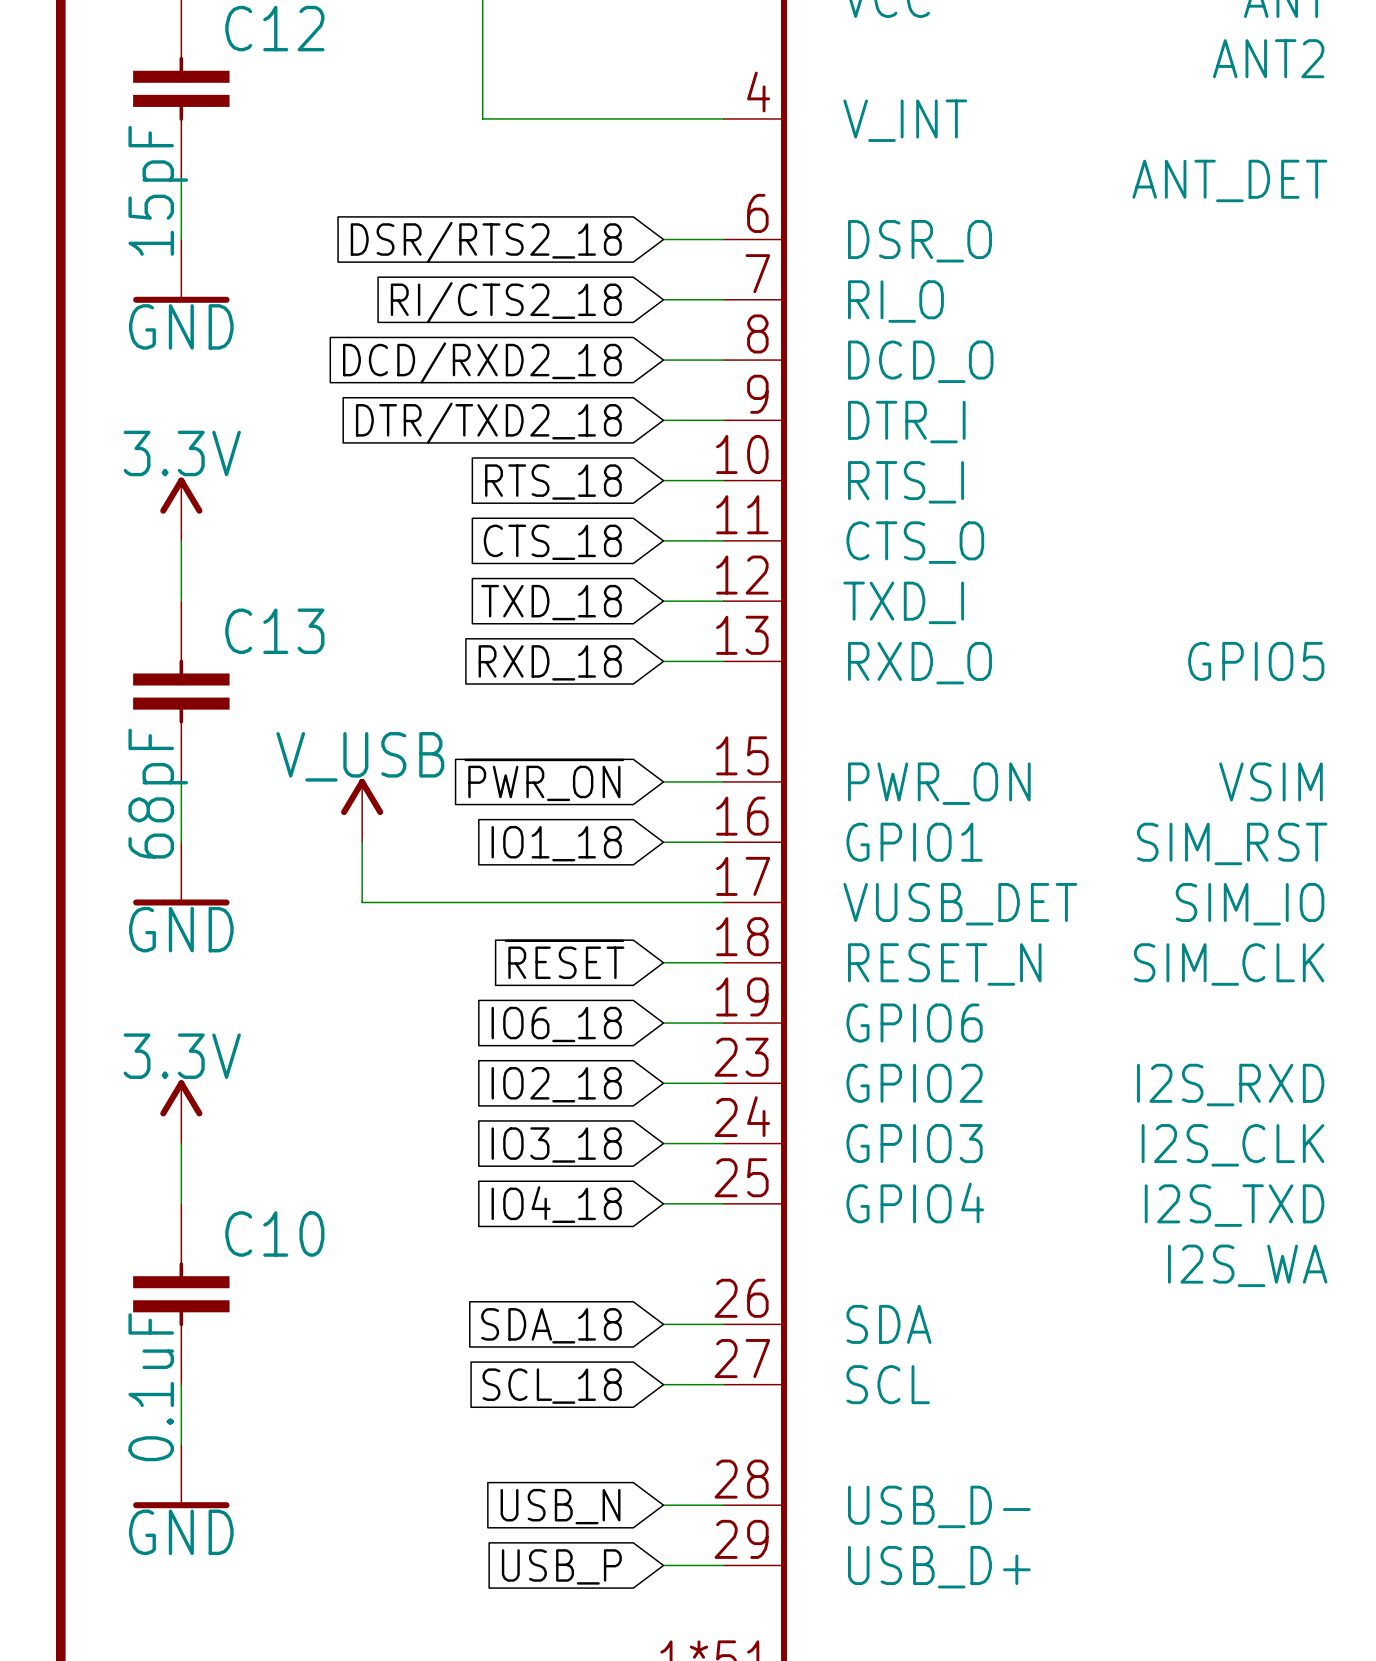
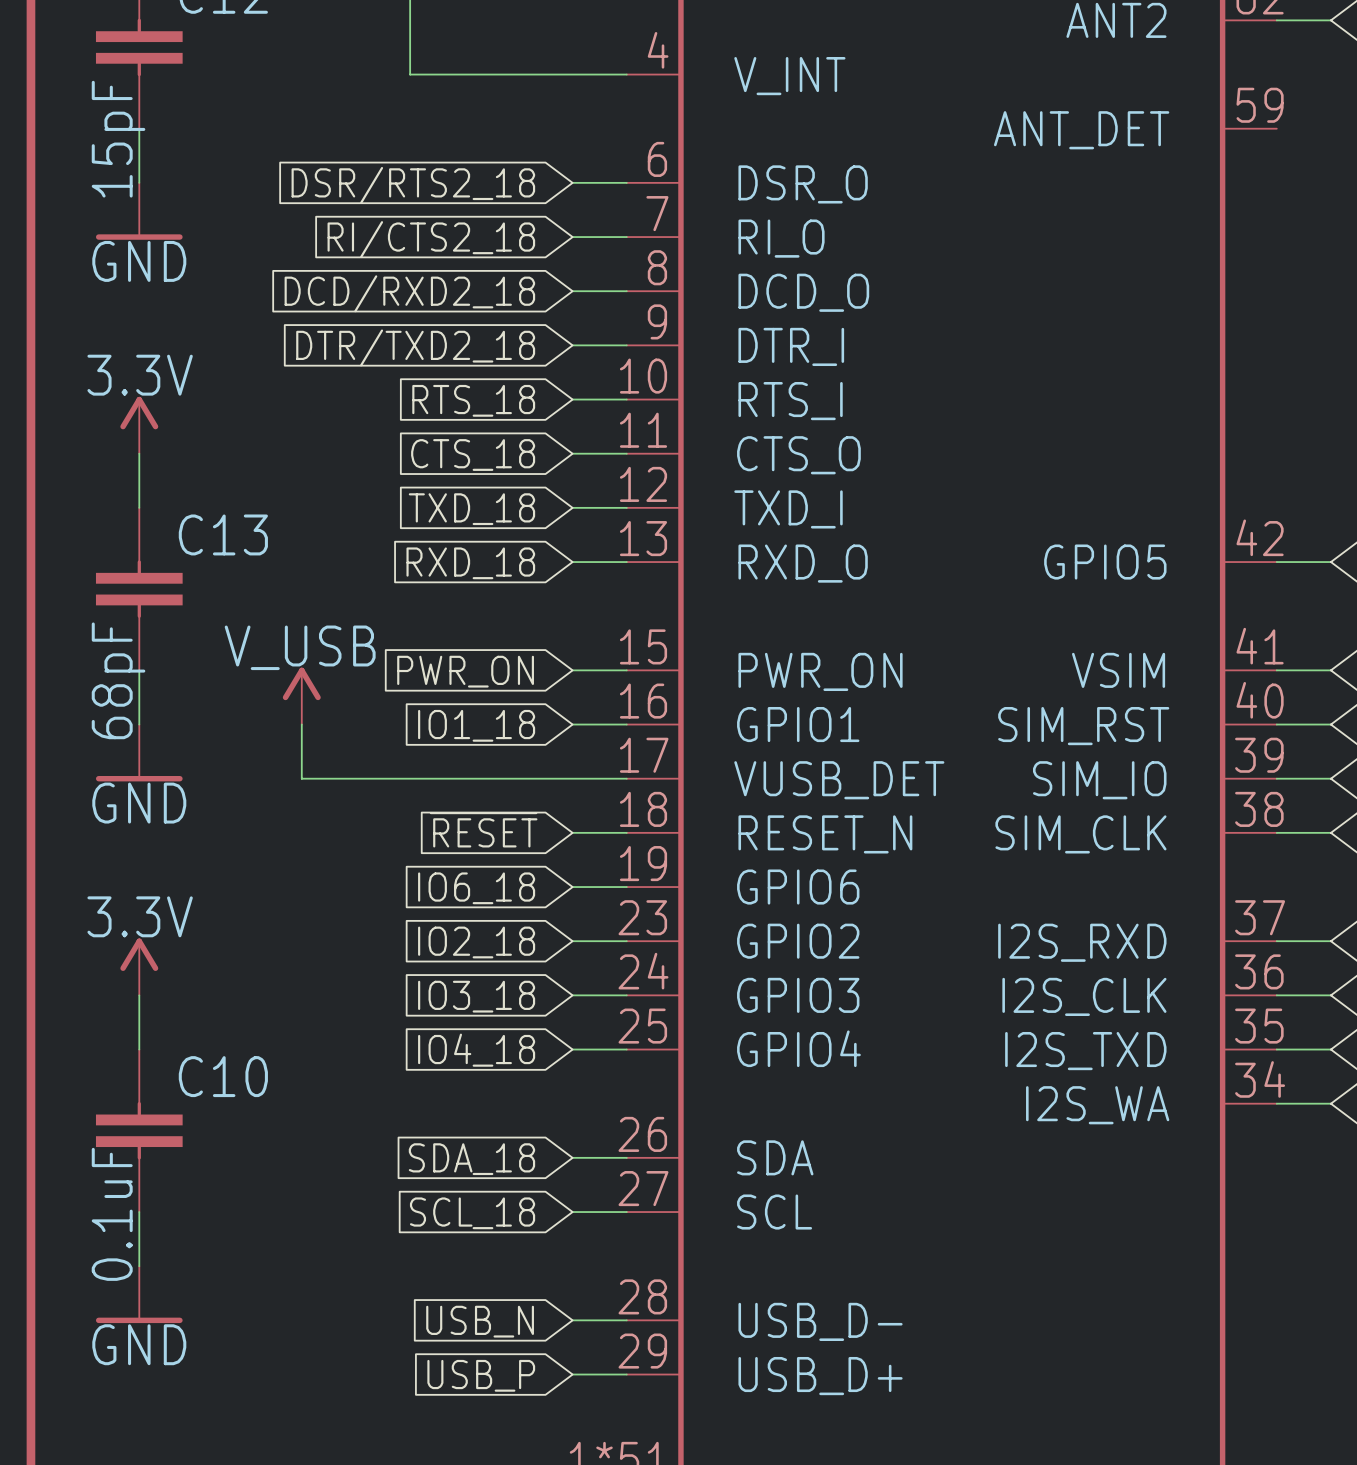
global label: ~{PWR_ON} (544, 779) -> PWR_ON (465, 671)

